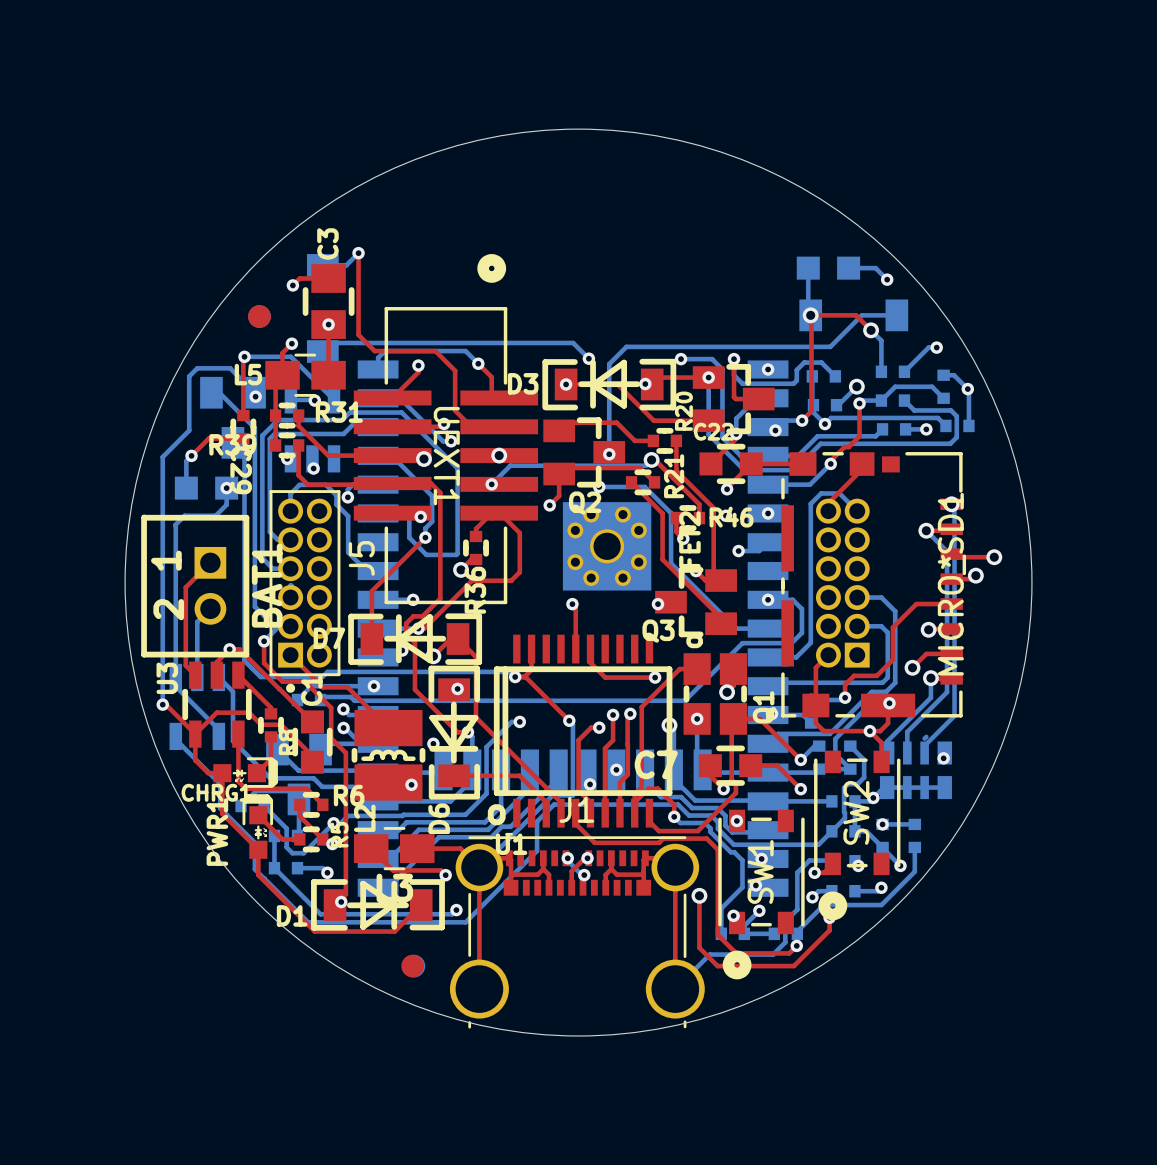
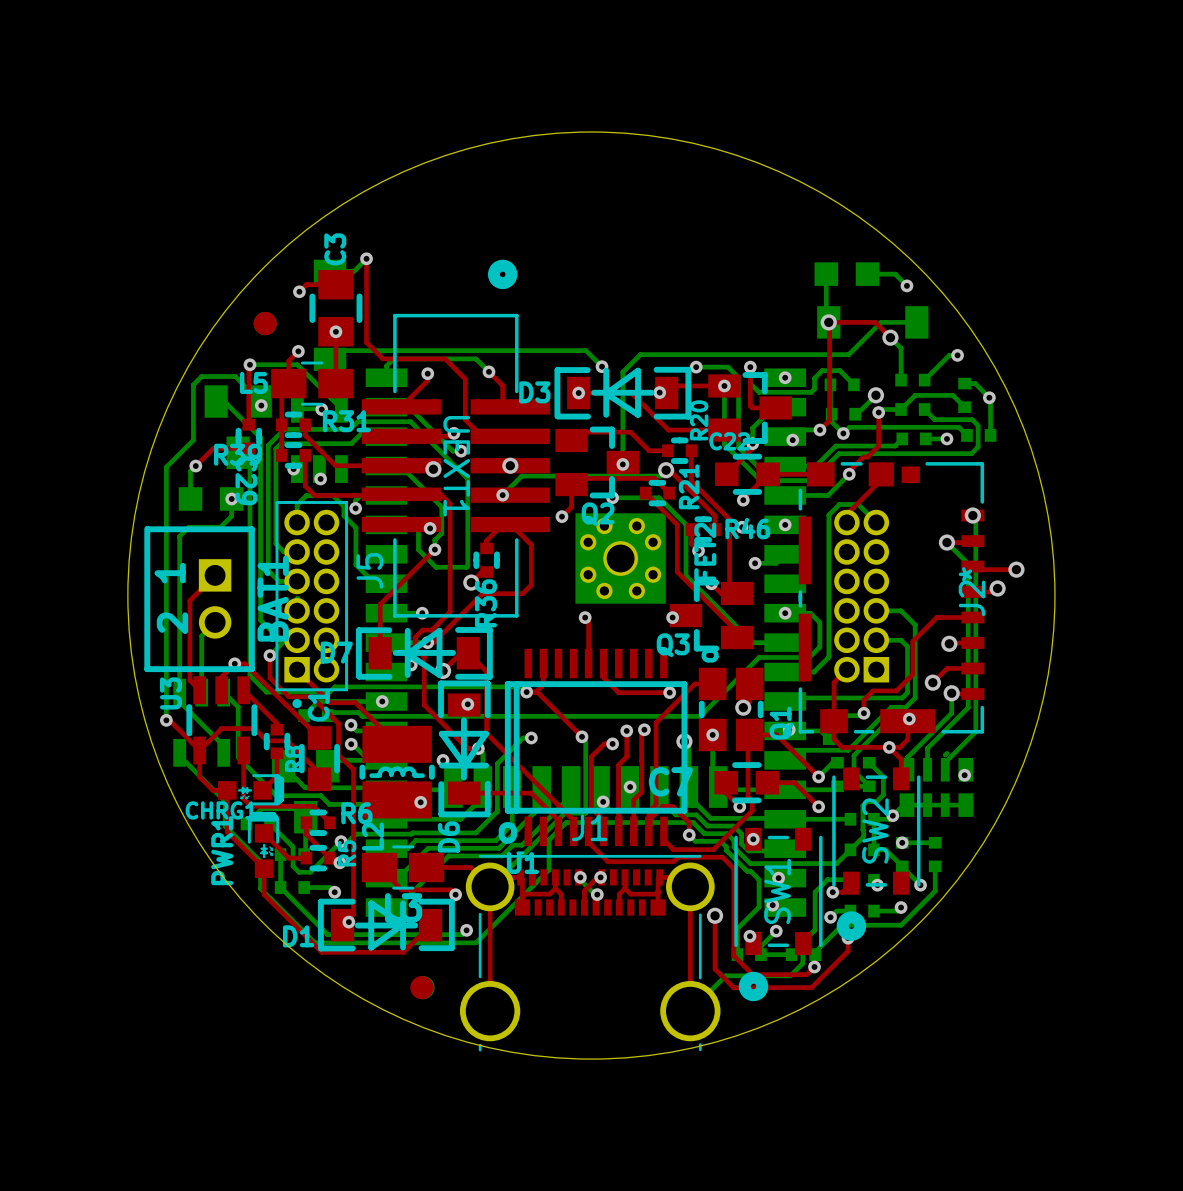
MICRO_SD1 name: MICRO_SD1 (951, 584) -> J2 (972, 598)

